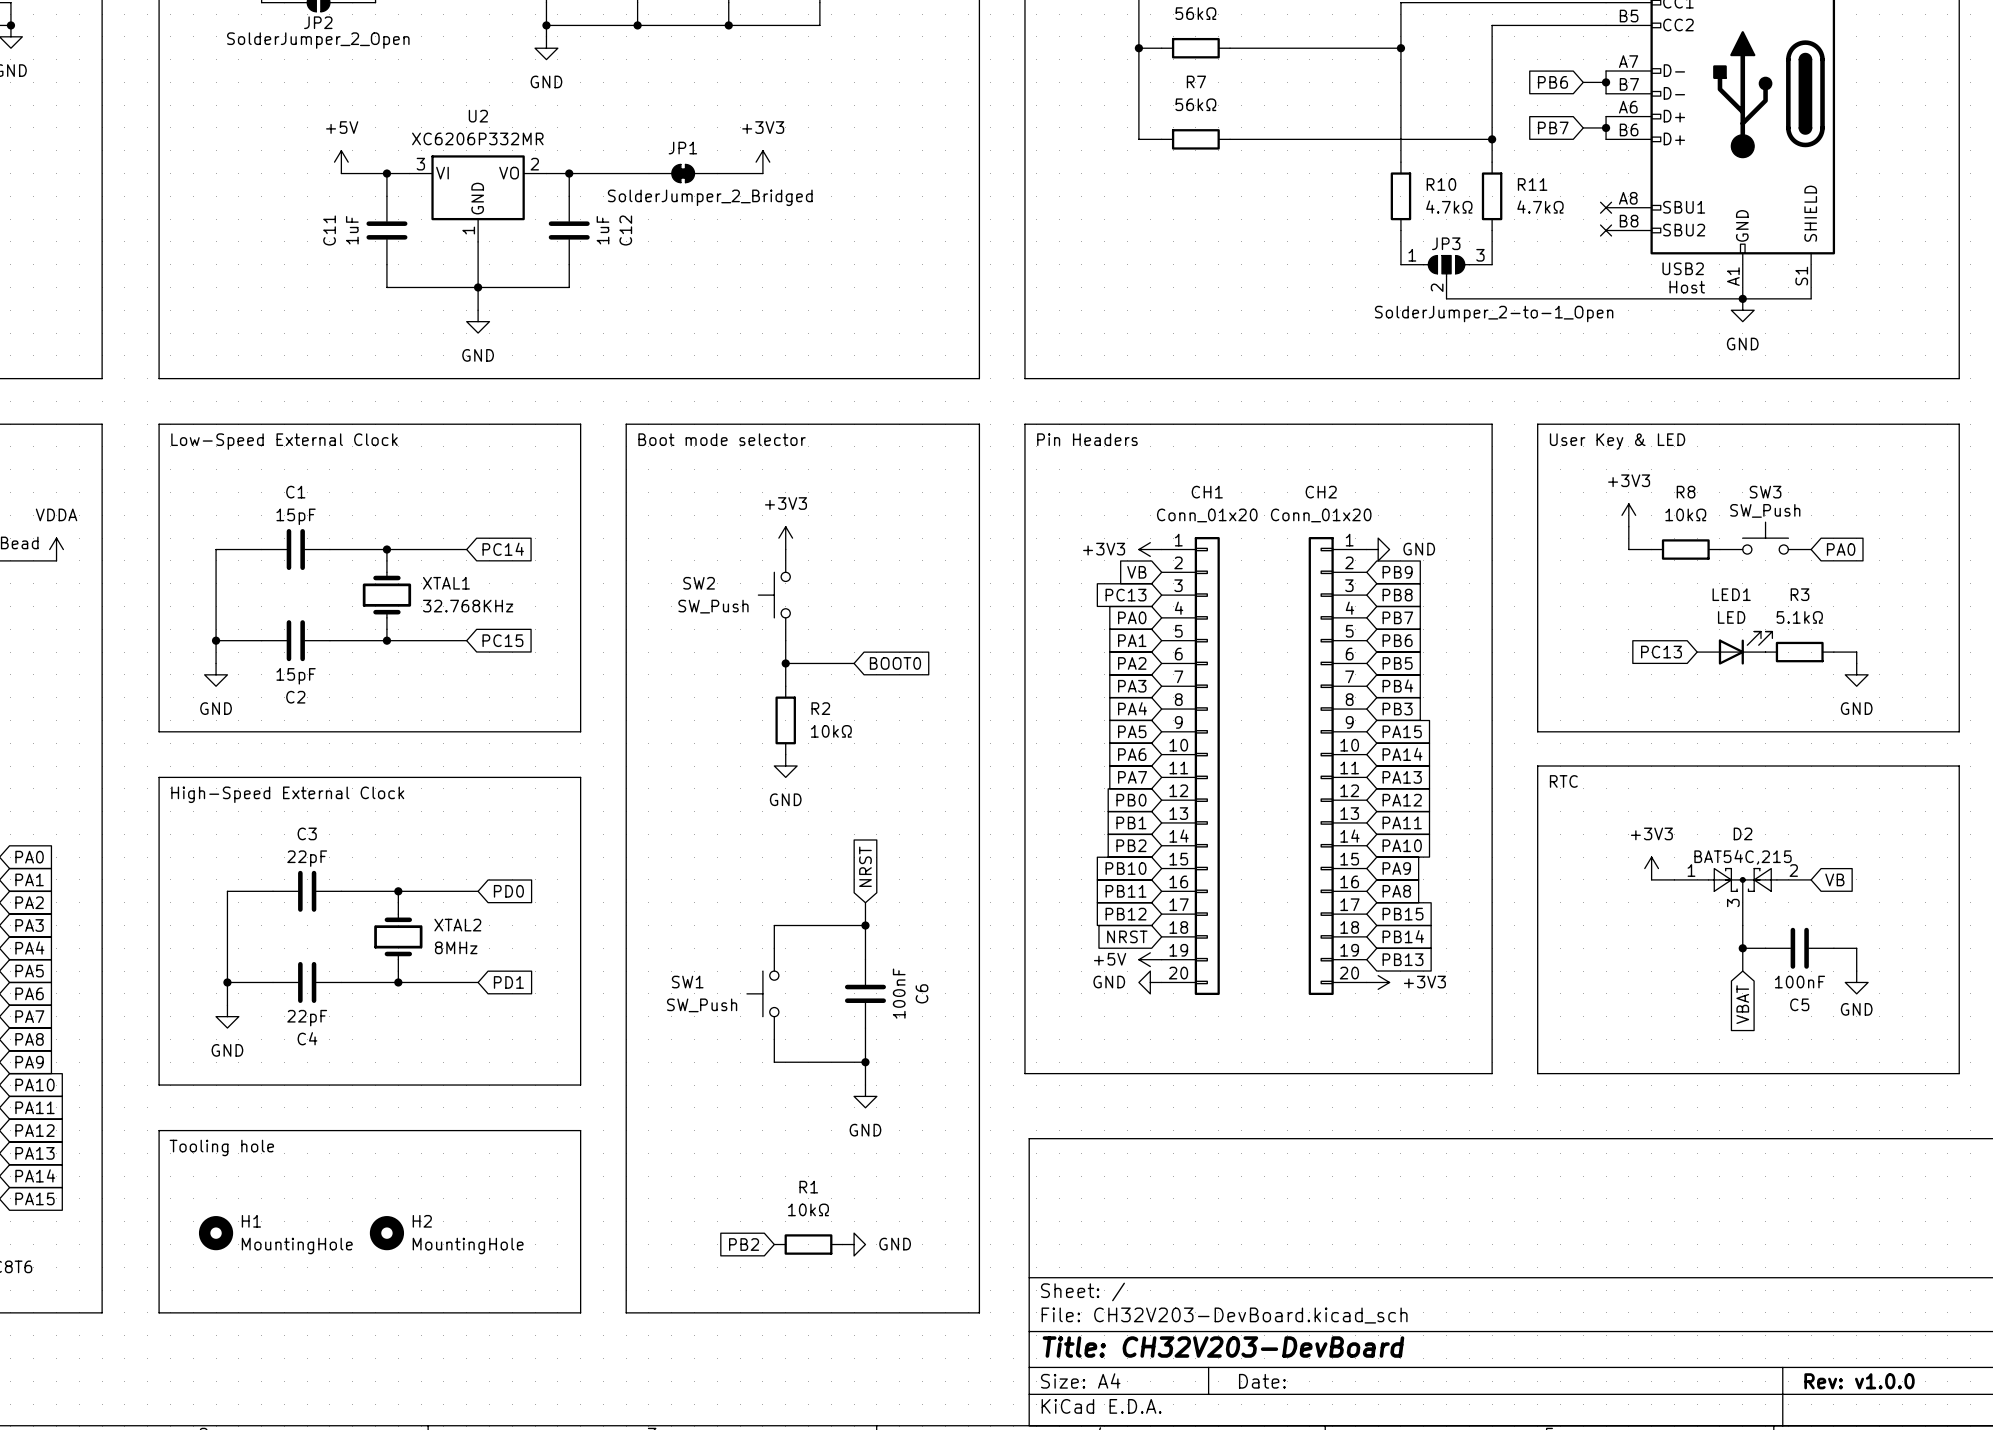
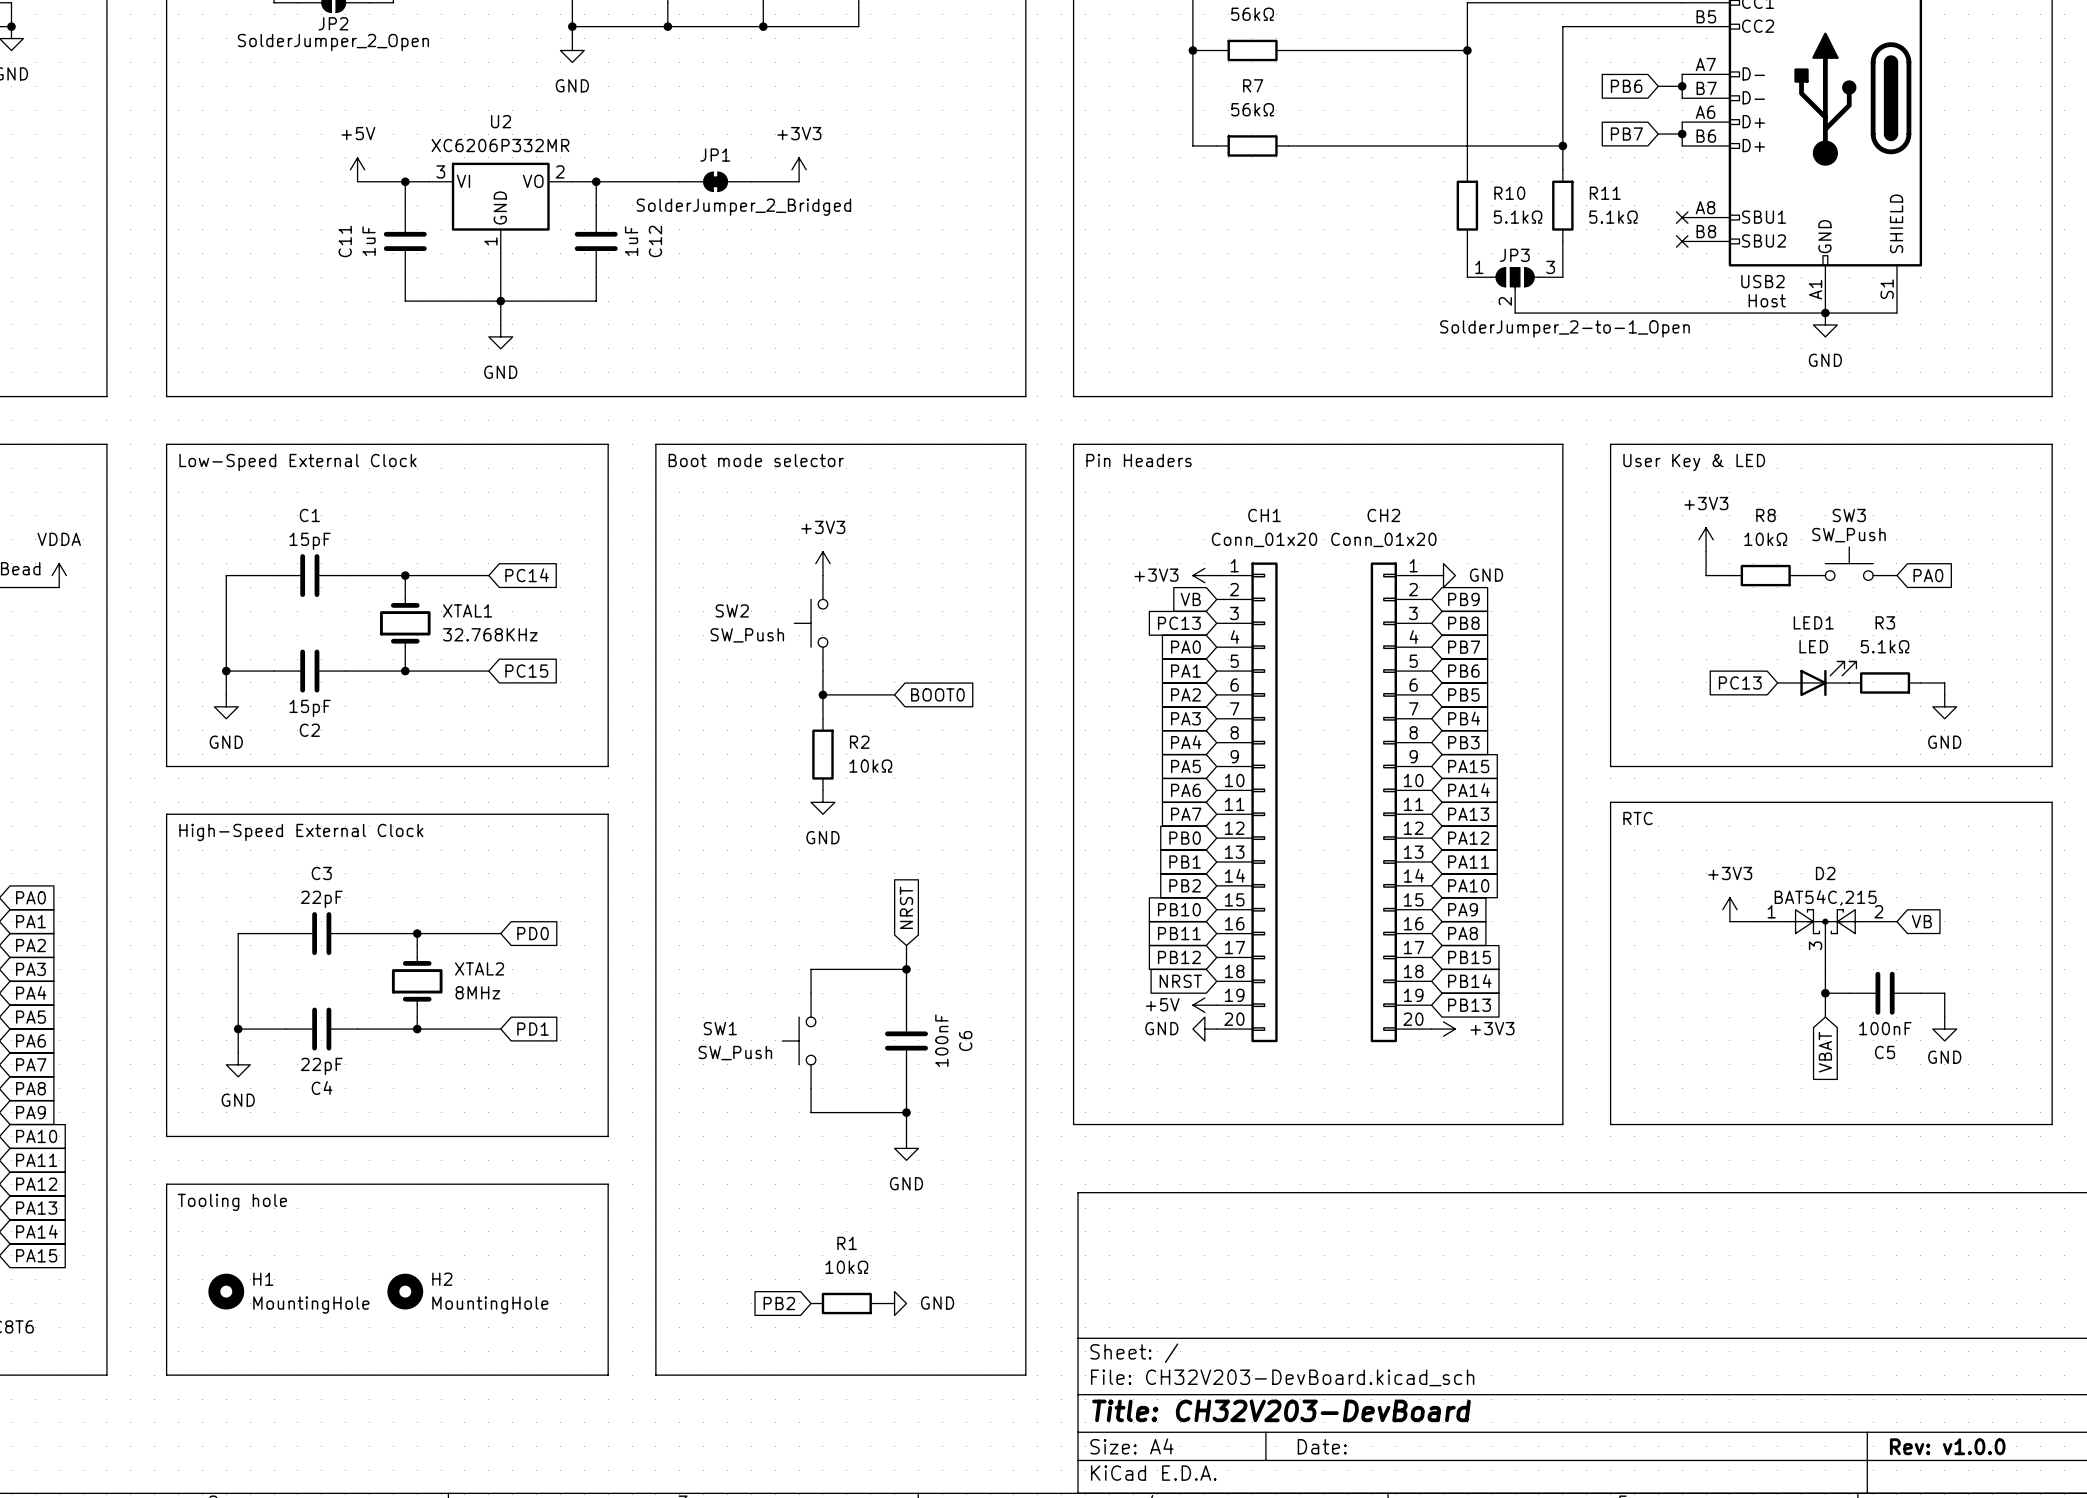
R10 value: 4.7kΩ (1449, 207) -> 5.1kΩ (1518, 217)
R11 value: 4.7kΩ (1540, 207) -> 5.1kΩ (1613, 217)

